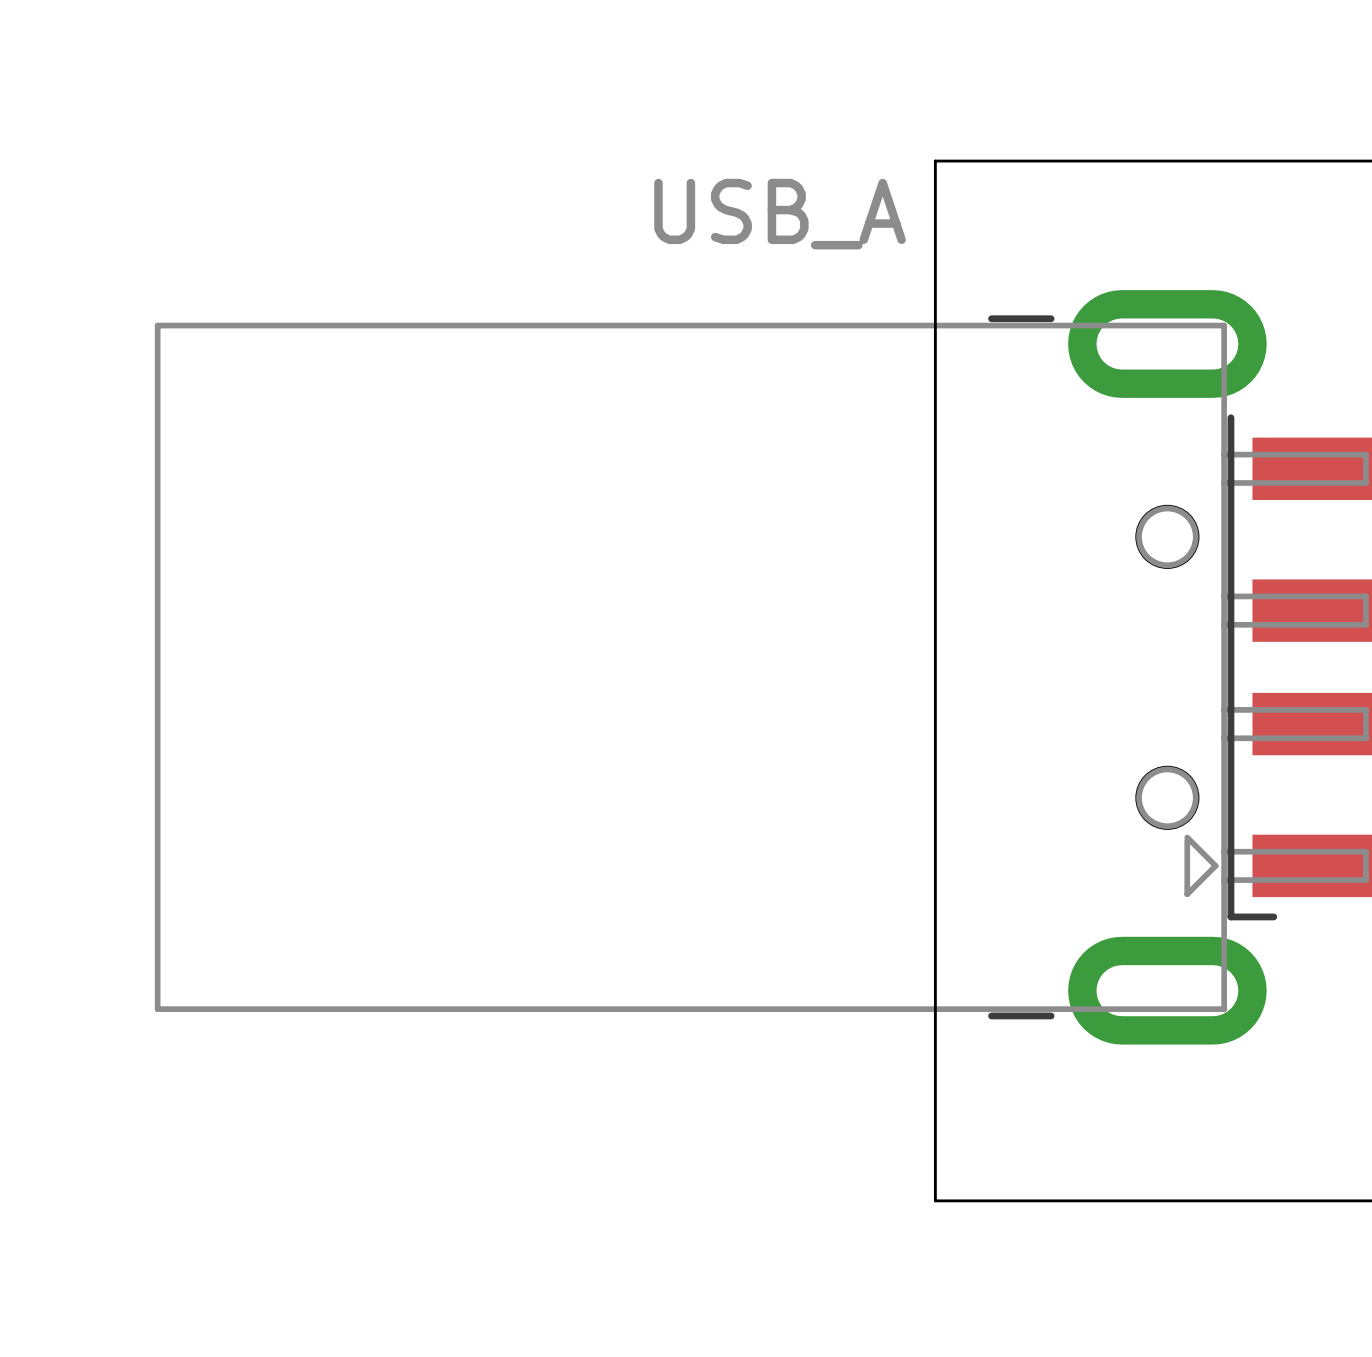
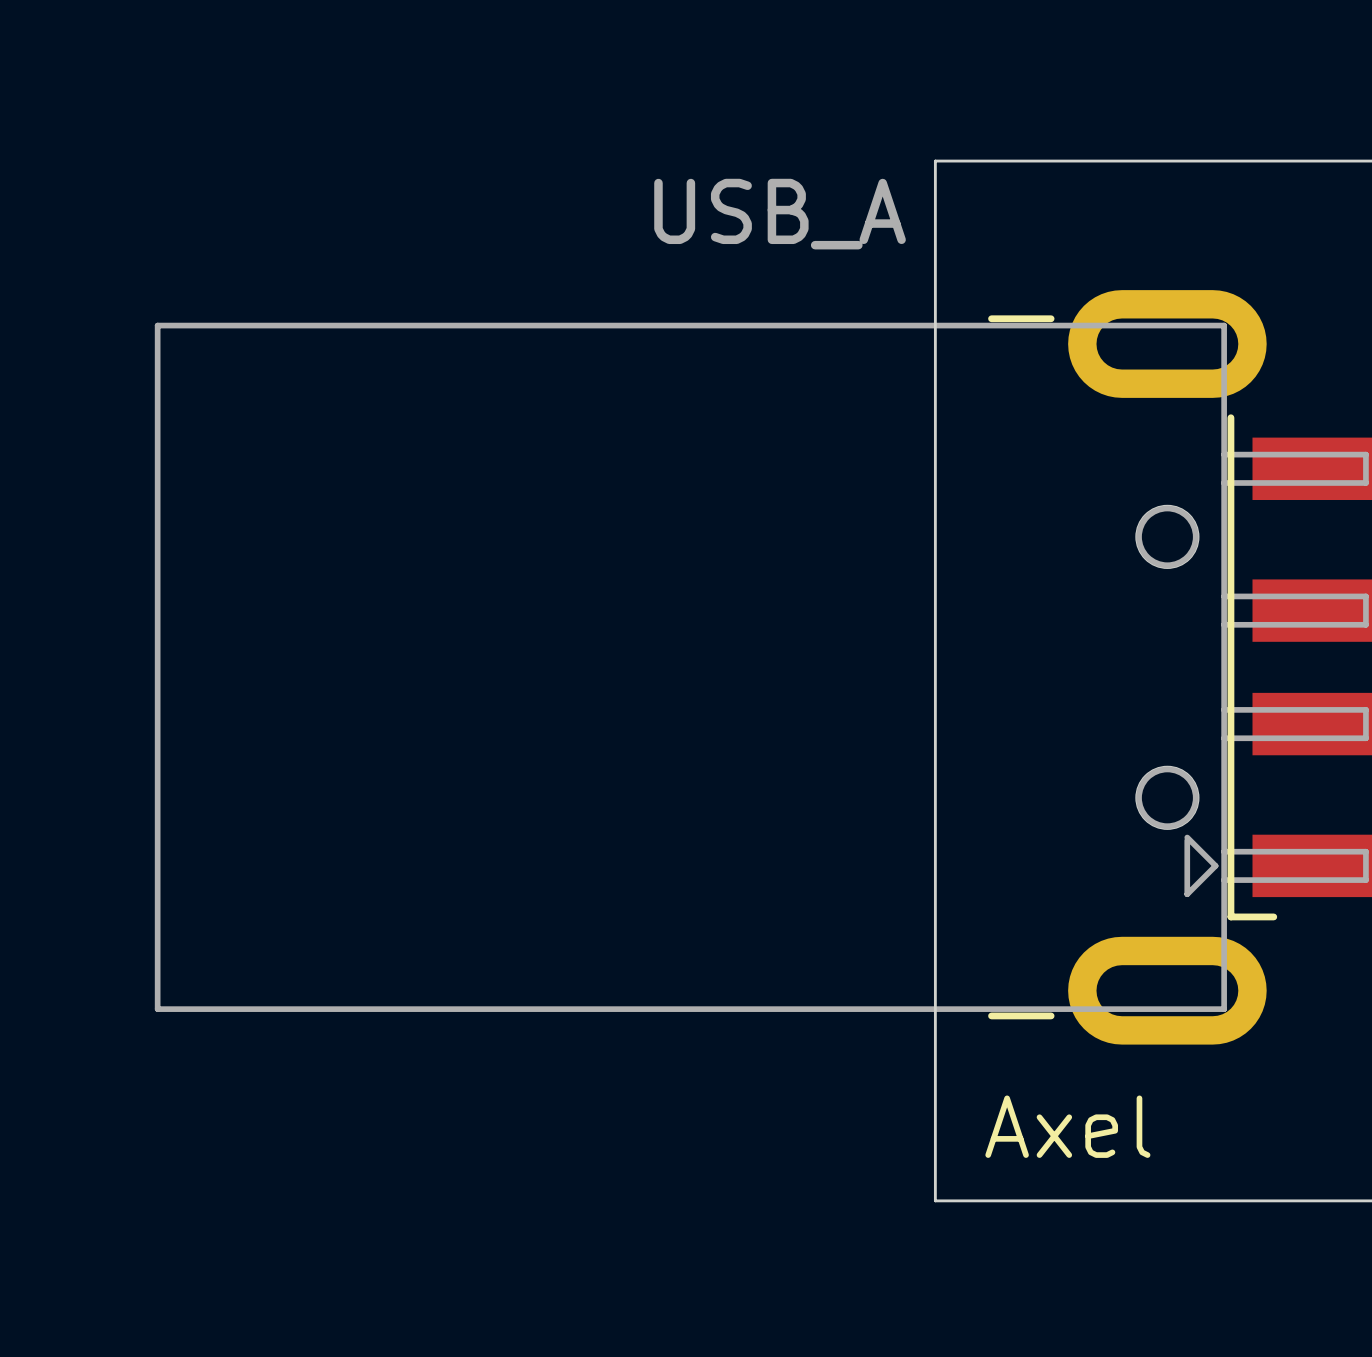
text: none -> Axel (1067, 1126)

